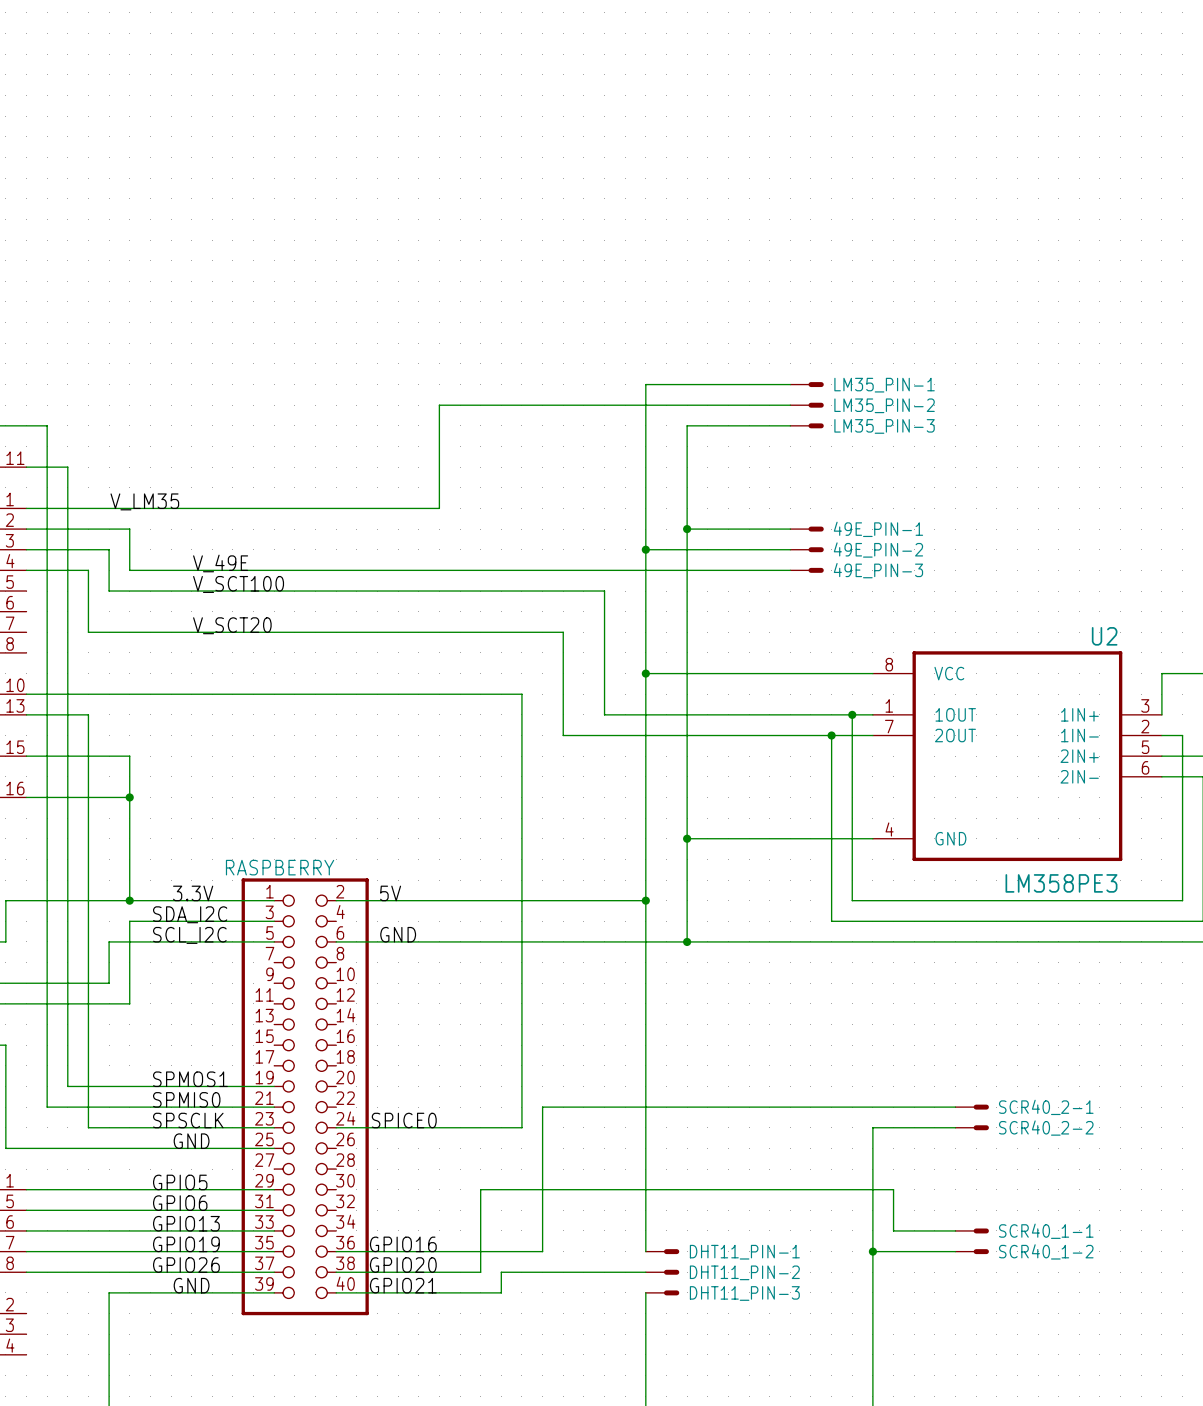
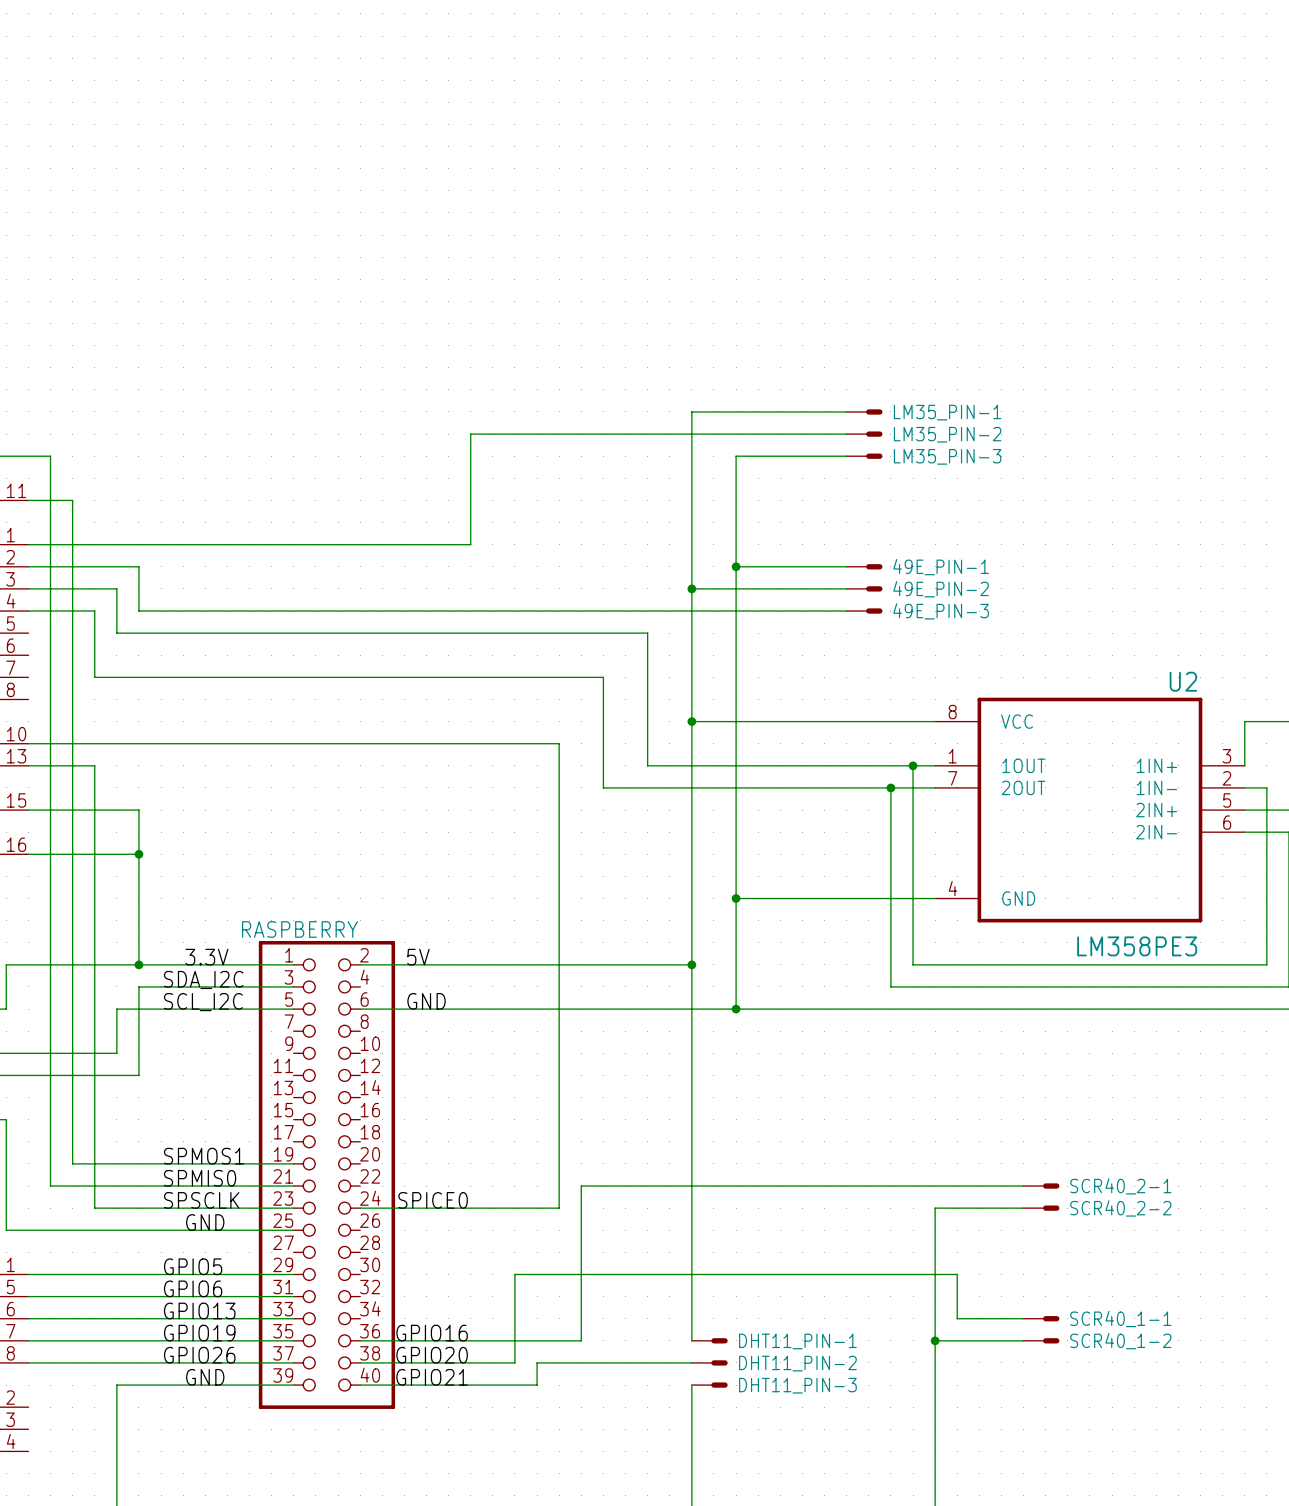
label: V_LM35 (144, 501) -> none
label: V_49E (220, 563) -> none
label: V_SCT100 (238, 584) -> none
label: V_SCT20 (232, 625) -> none

